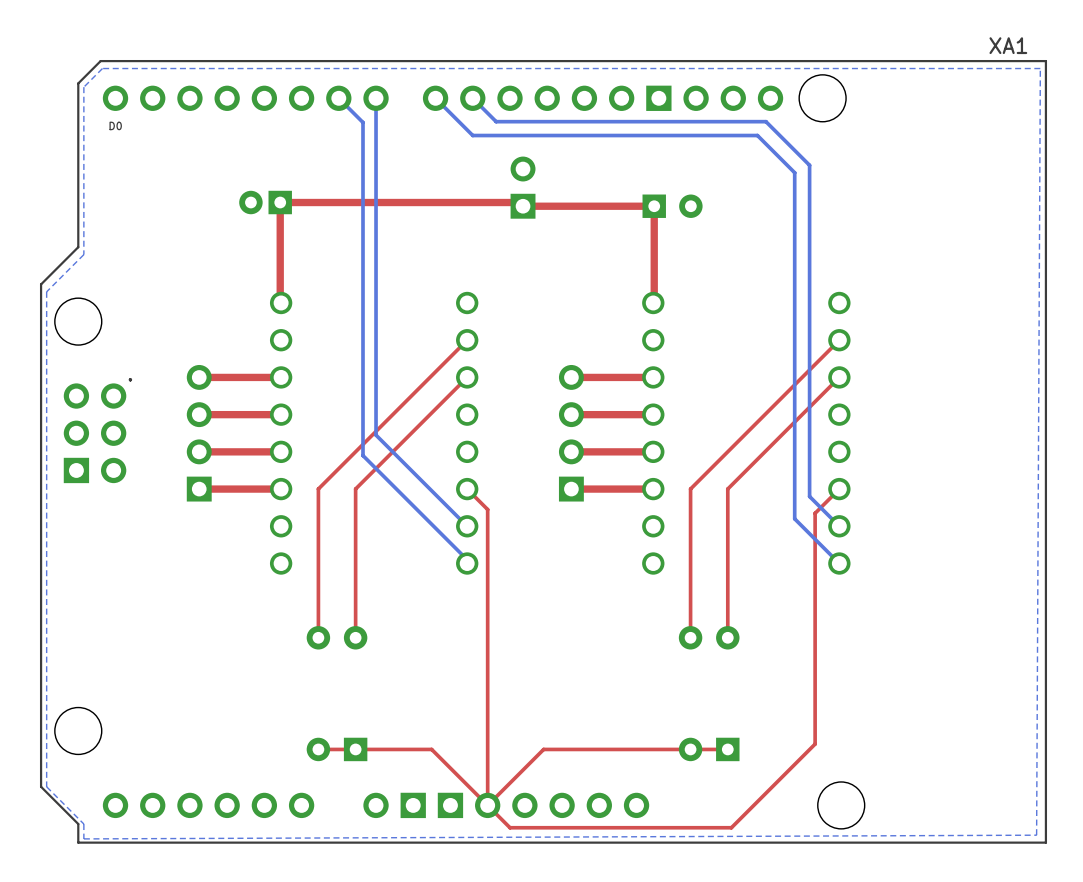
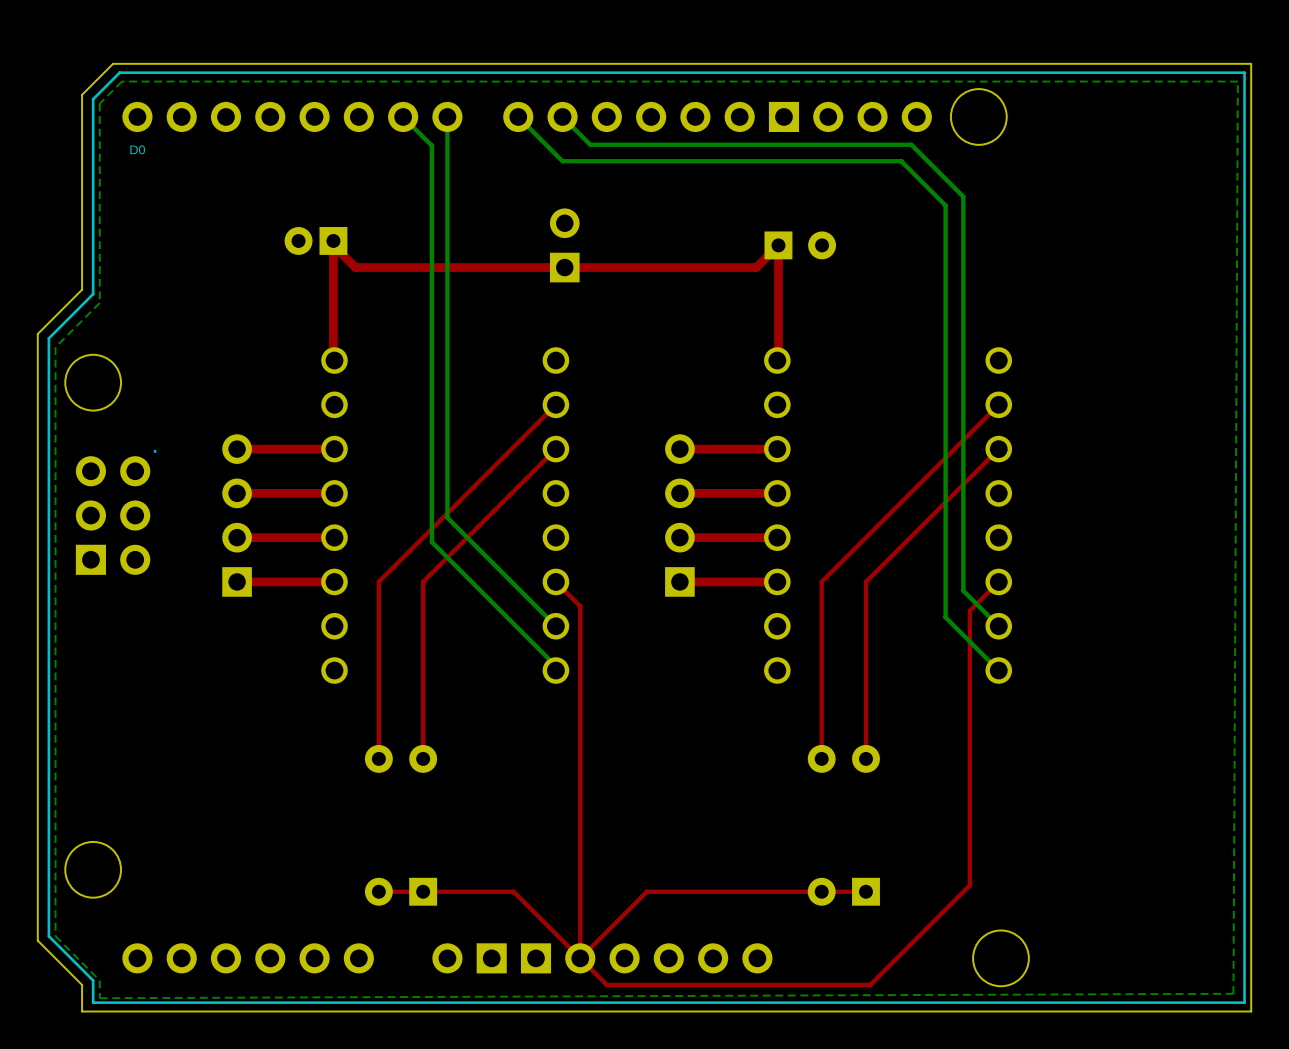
XA1 name: XA1 (1008, 45) -> none
board edge: none -> (1251, 63) (113, 63) (82, 94) (82, 289) (37, 333) (37, 940) (82, 984) (82, 1011) (1251, 1011) (1251, 63)
part position: (523, 187) -> (564, 245)
top track: (280, 202) (519, 202) (523, 206) (654, 206) -> (333, 245) (355, 267) (756, 267) (778, 245)

